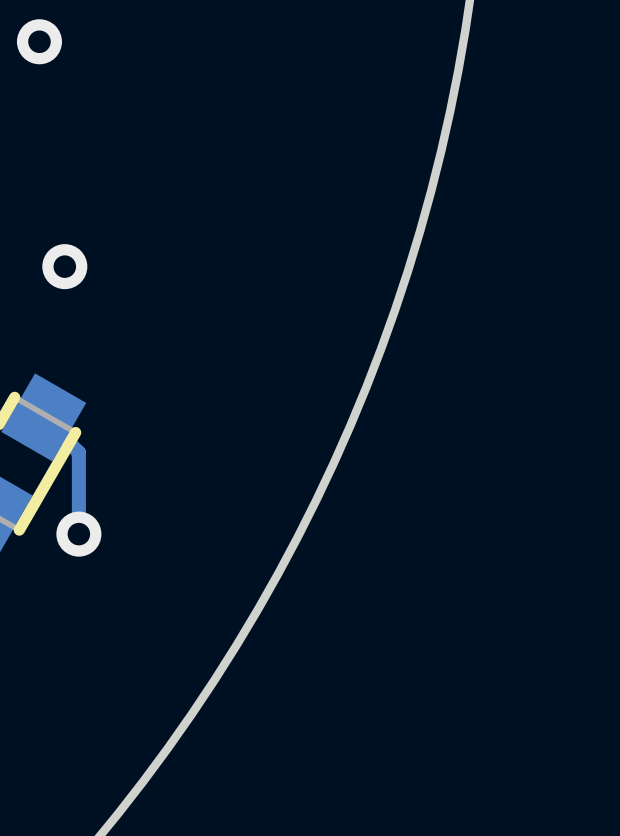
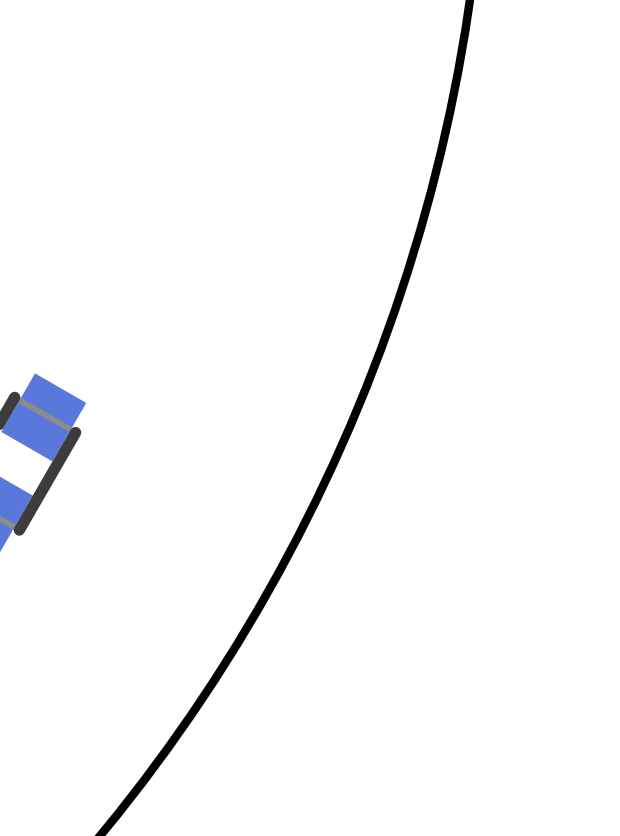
via: (39, 41) -> none
via: (64, 266) -> none
track: (43, 417) (78, 452) (78, 534) -> none
via: (78, 534) -> none

